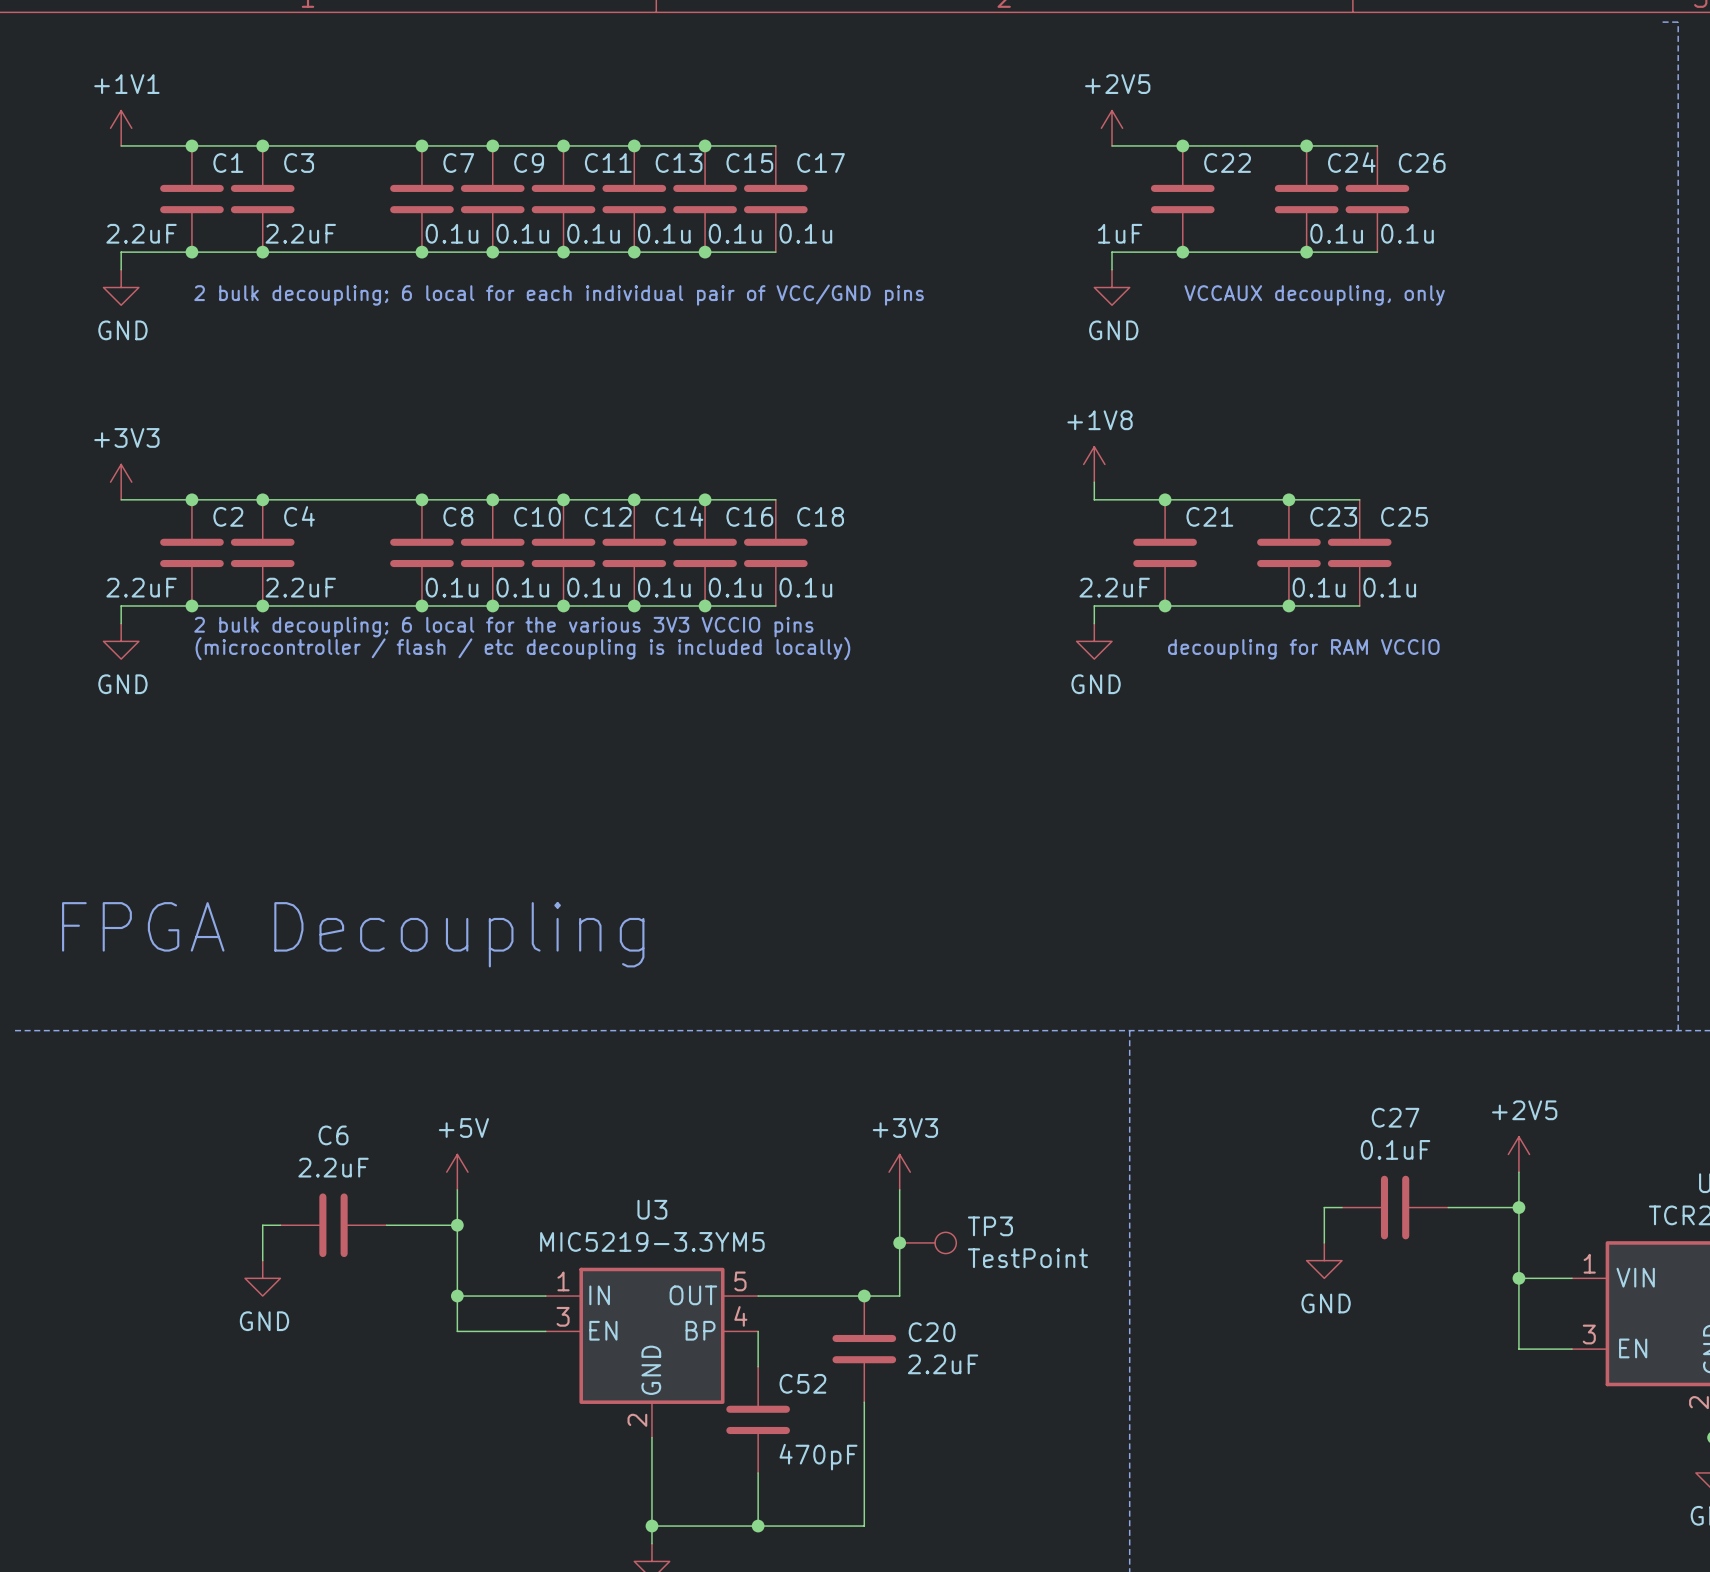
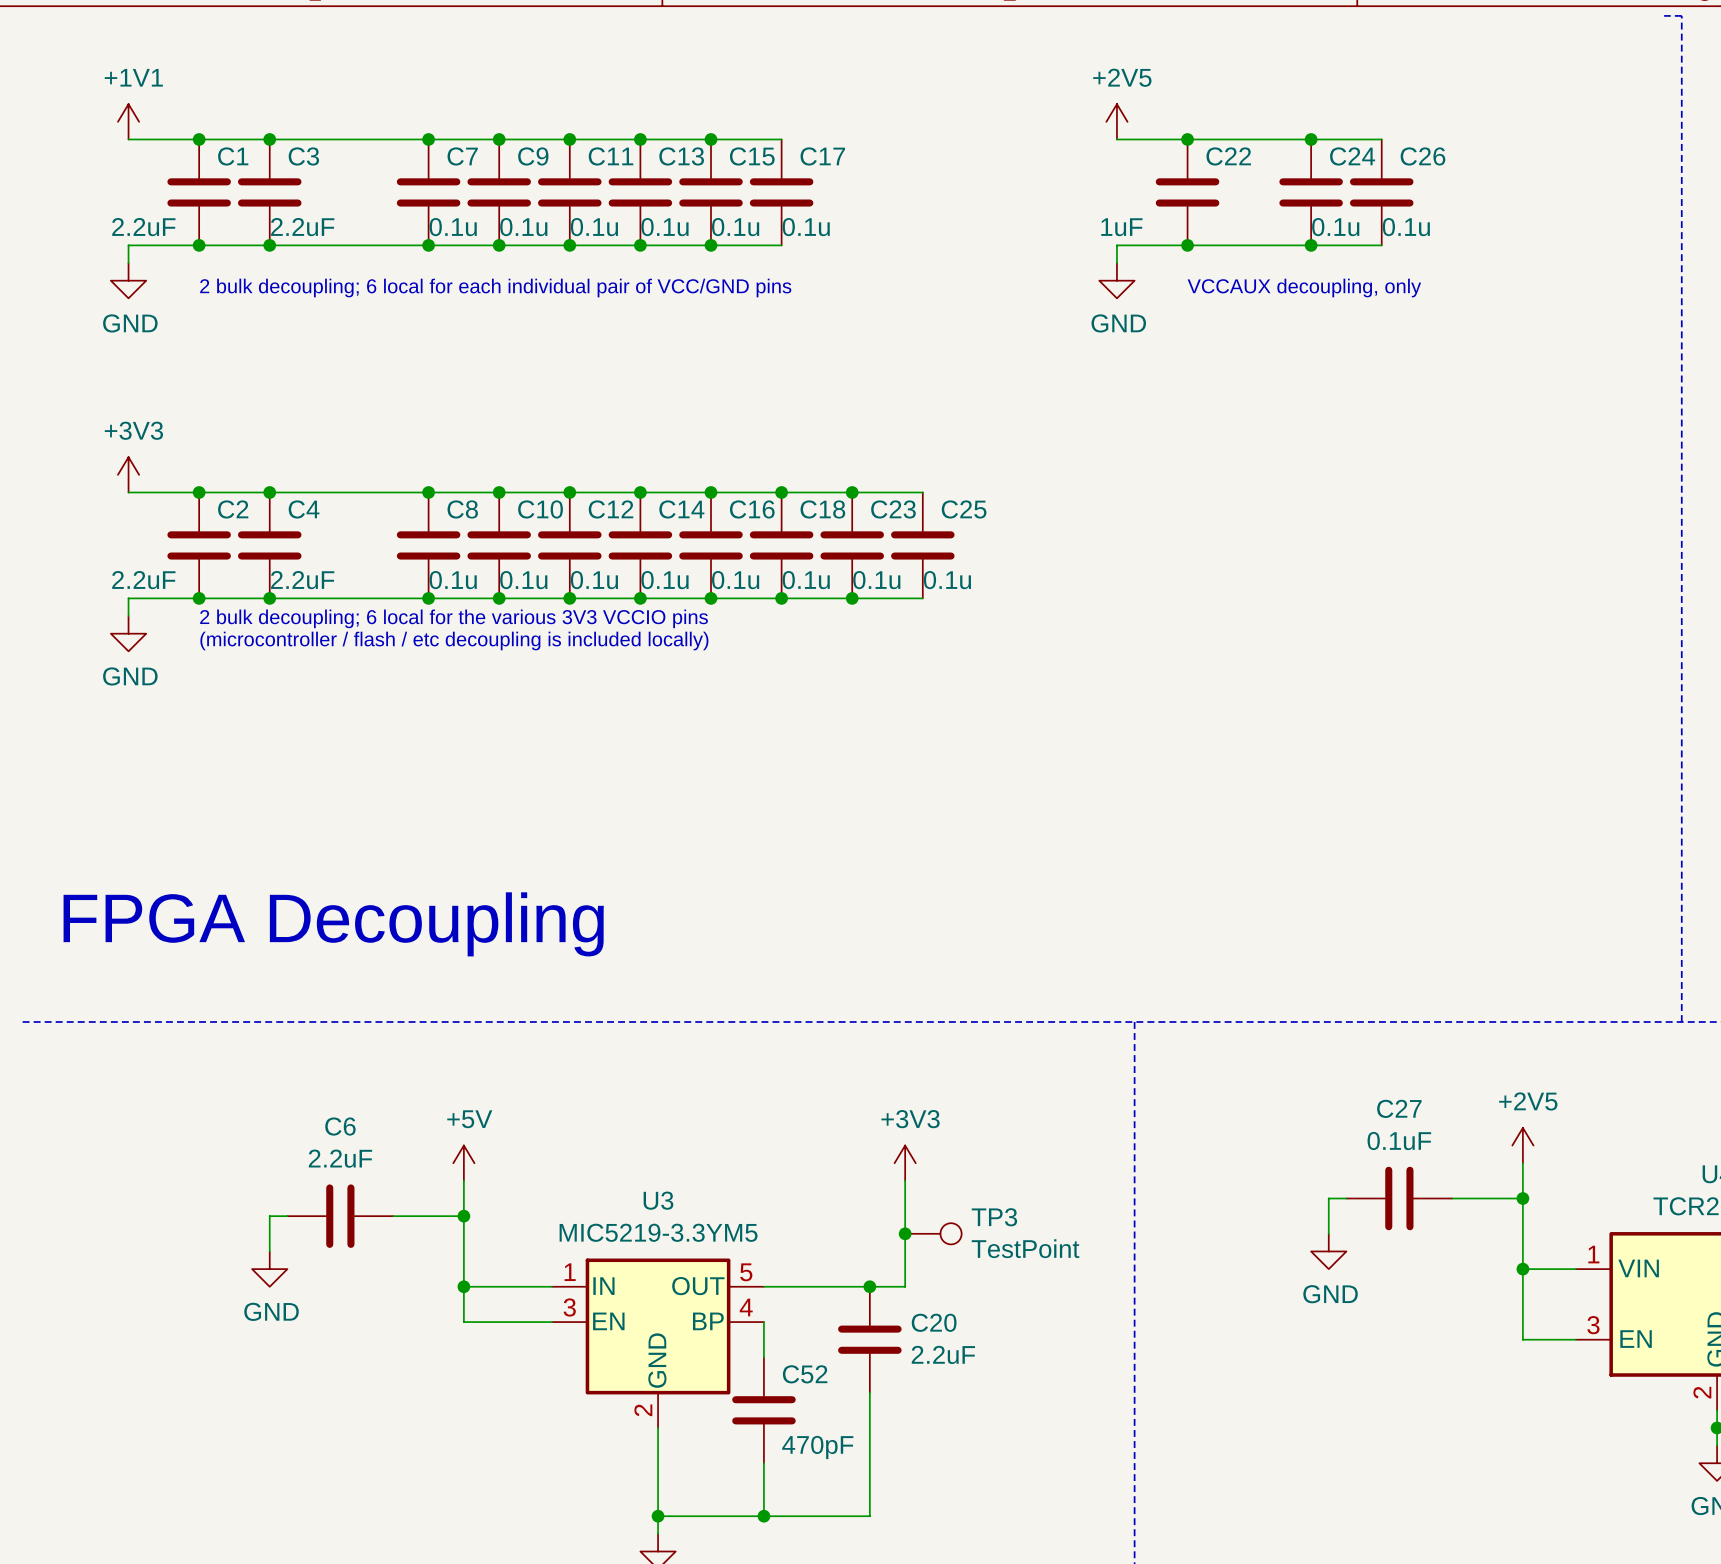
power symbol: +1V8 (1094, 464) -> none
wire: (1094, 482) (1094, 499) (1359, 499) -> none
wire: none -> (781, 492) (922, 492)
junction: none -> (781, 492)
junction: none -> (852, 492)
junction: (1165, 499) -> none
junction: (1288, 499) -> none
C21: 2.2uF (1165, 552) -> none
C23 position: (1288, 552) -> (852, 545)
C25 position: (1359, 552) -> (922, 545)
wire: none -> (781, 598) (922, 598)
junction: none -> (781, 598)
junction: none -> (852, 598)
junction: (1165, 605) -> none
junction: (1288, 605) -> none
wire: (1359, 605) (1094, 605) (1094, 623) -> none
power symbol: GND (1094, 641) -> none
text: decoupling for RAM VCCIO (1303, 649) -> none

